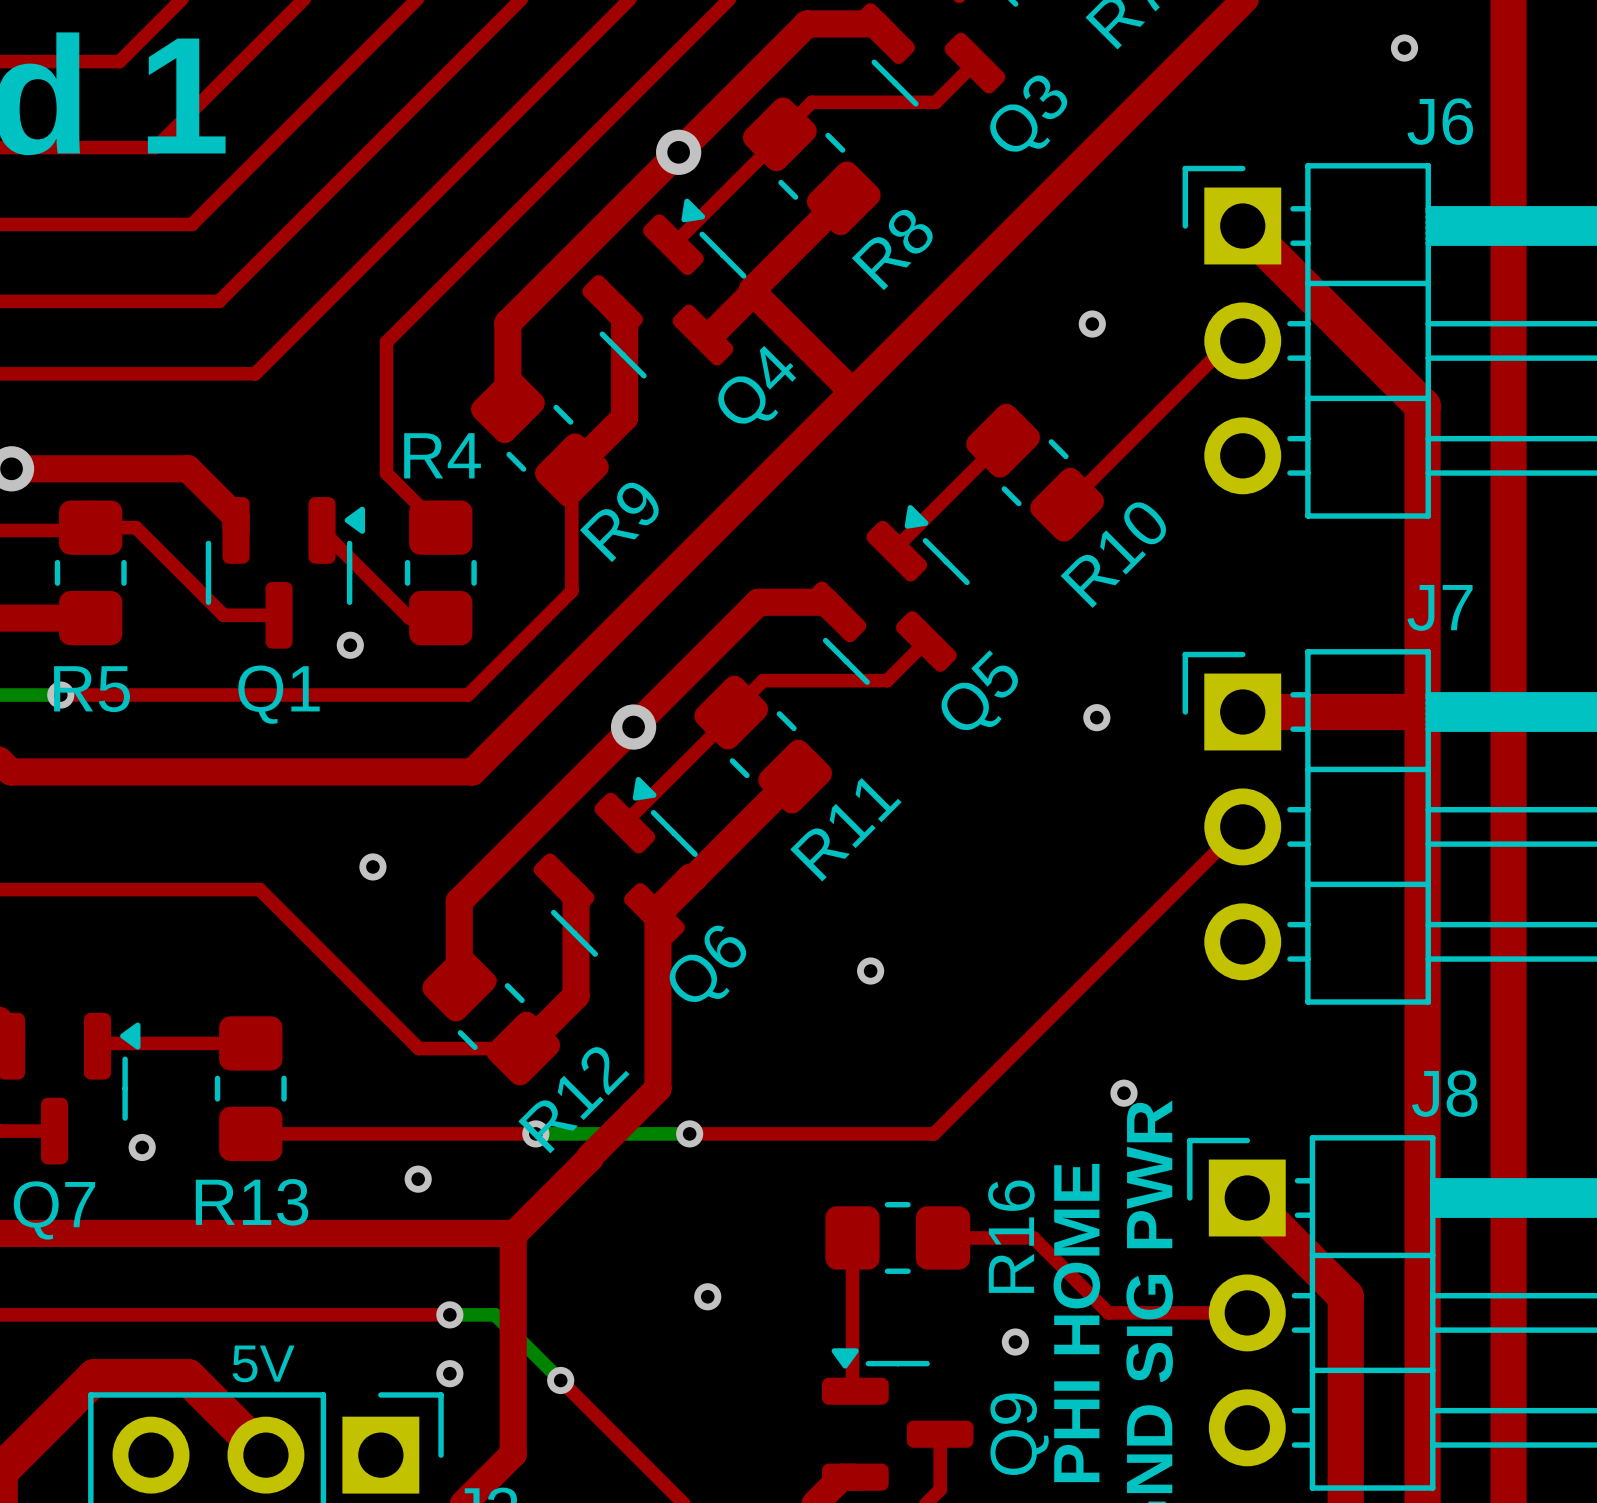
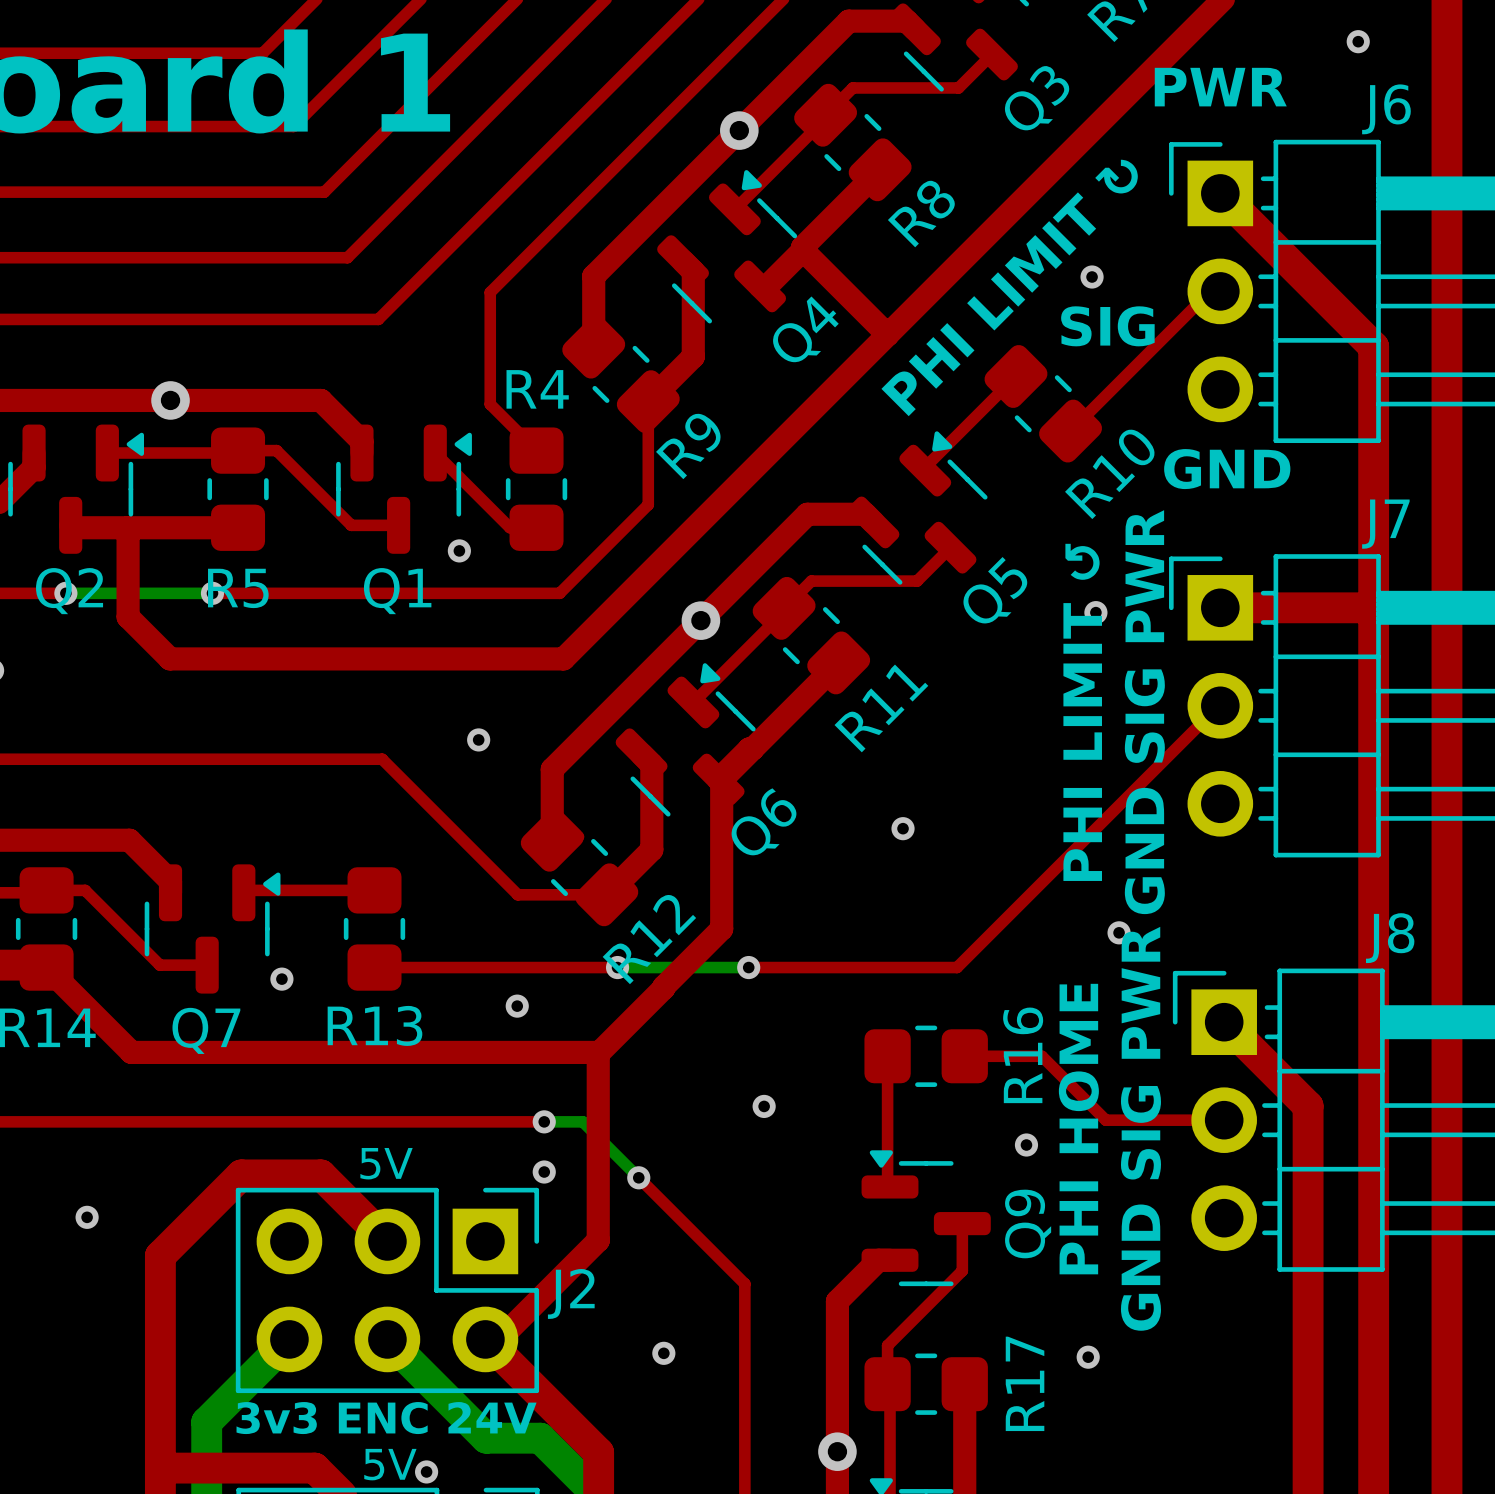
text: none -> PWR (1220, 87)
text: none -> PHI LIMIT ↻ (1009, 287)
text: none -> SIG (1107, 326)
text: none -> GND (1227, 469)
text: none -> GND SIG PWR (1144, 712)
text: none -> PHI LIMIT ↺ (1082, 712)

